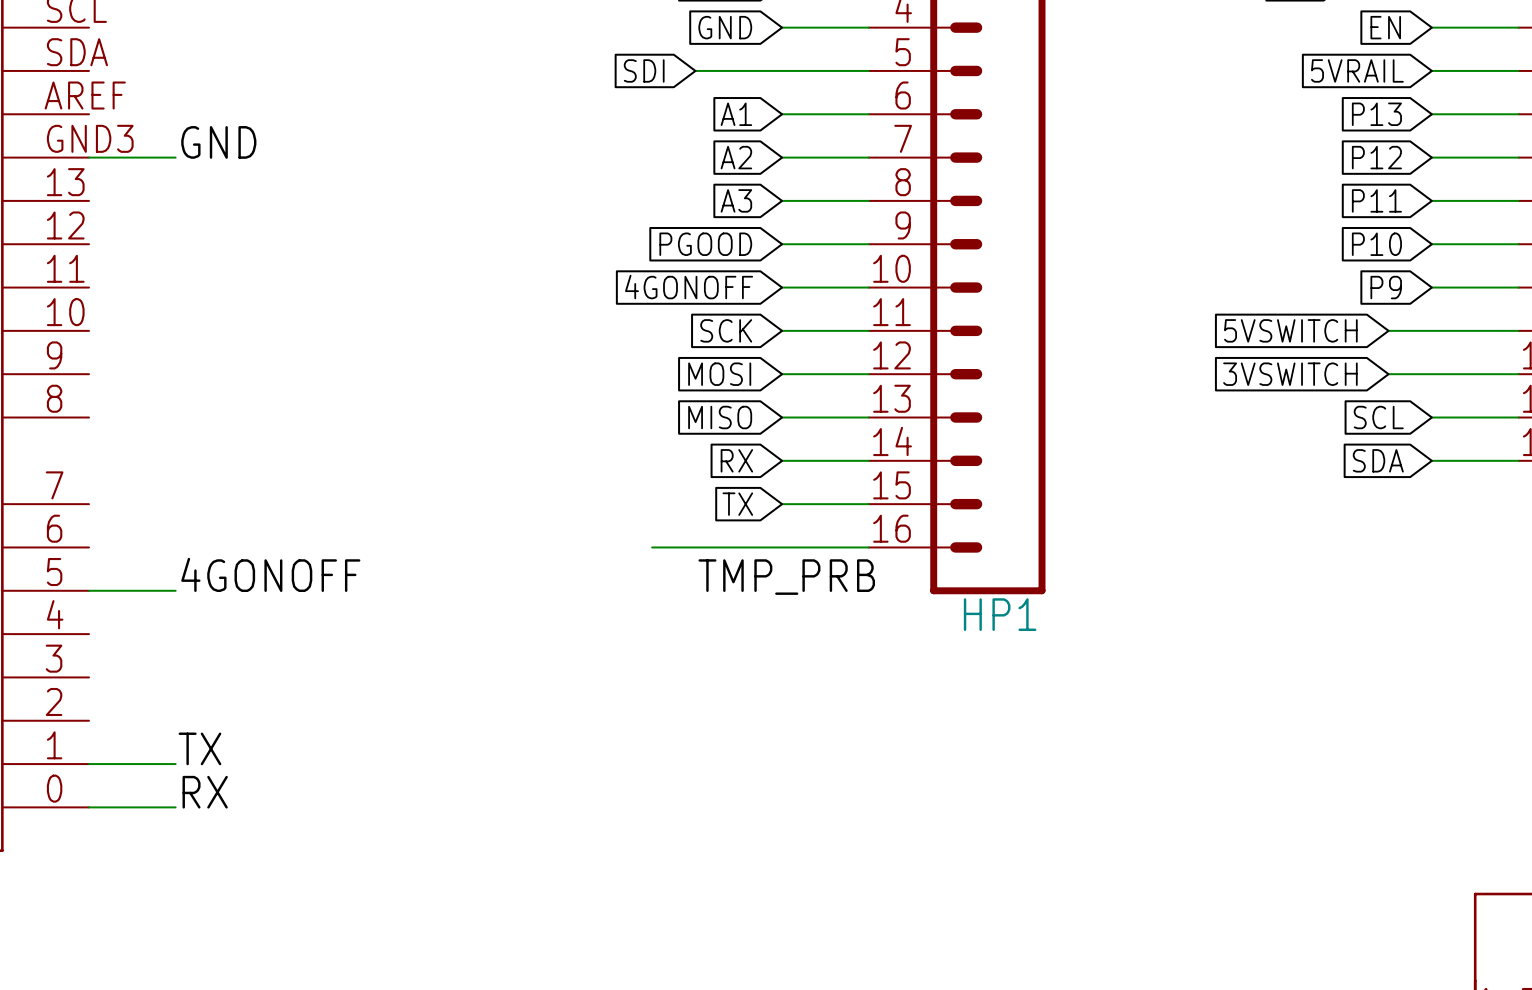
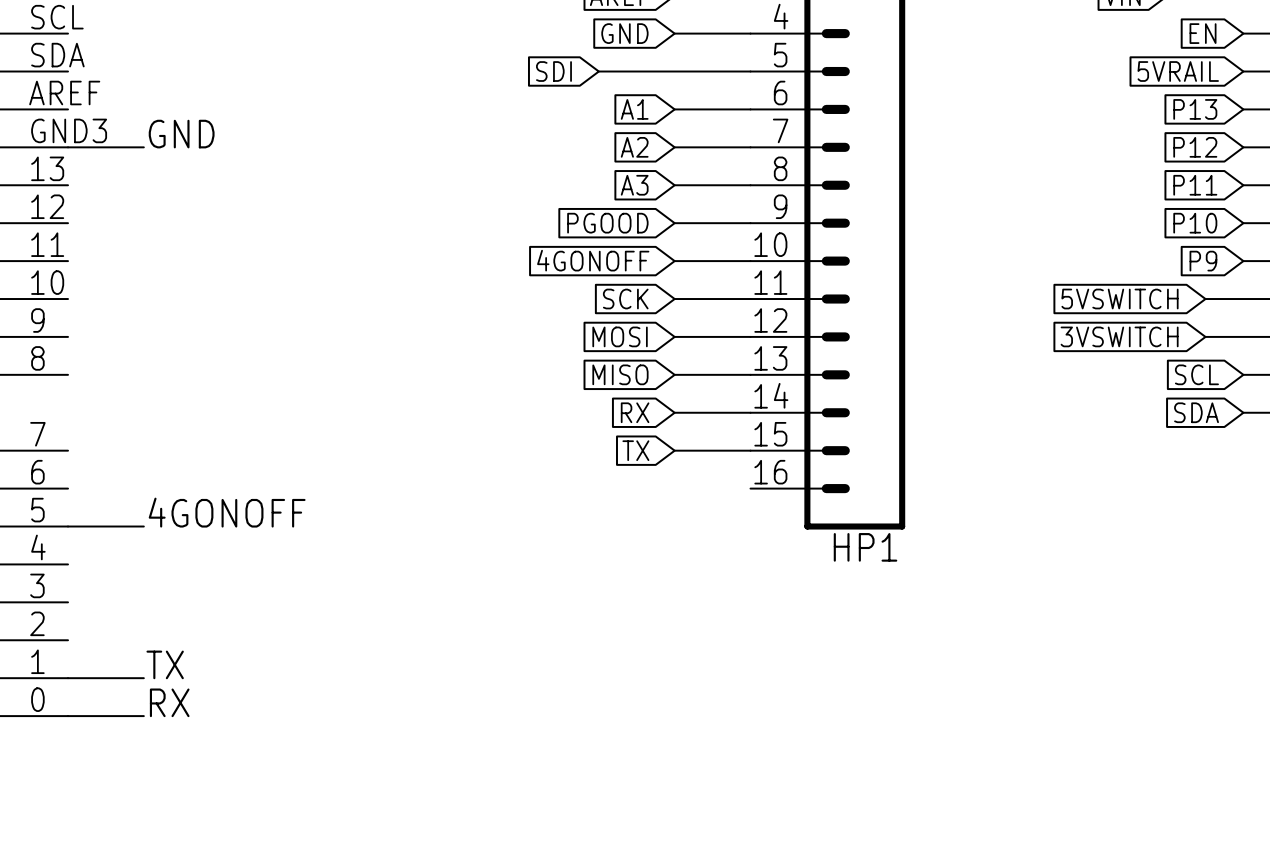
wire: (652, 547) (868, 547) -> none
label: TMP_PRB (786, 577) -> none

